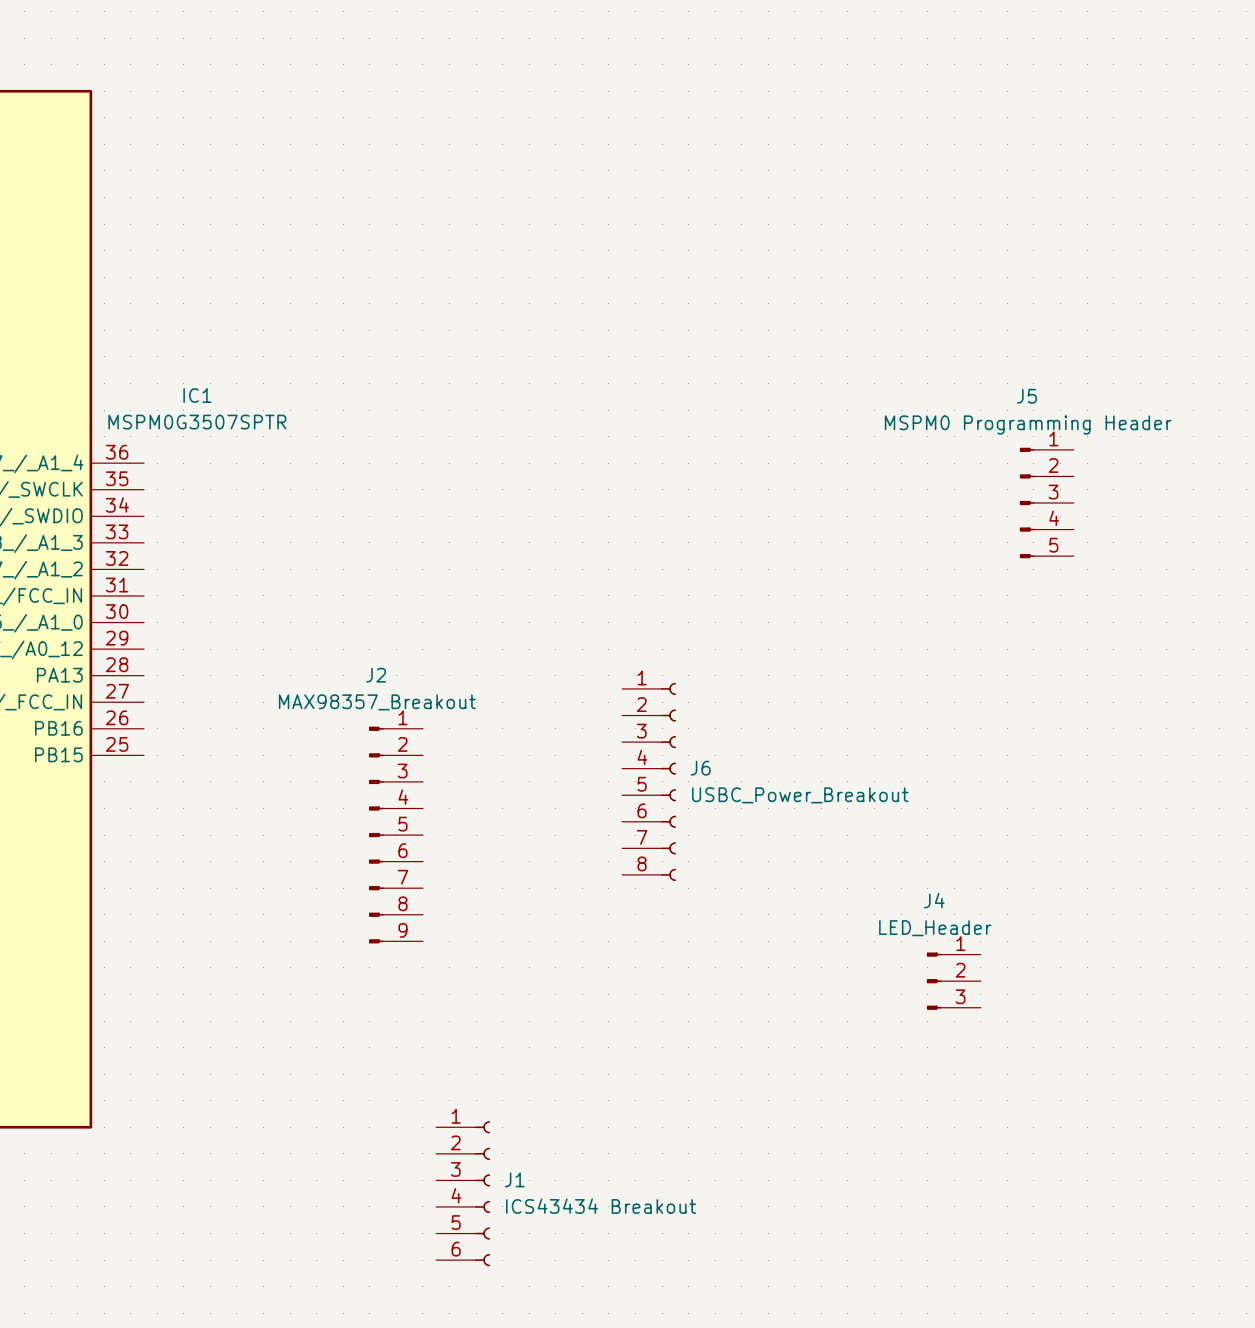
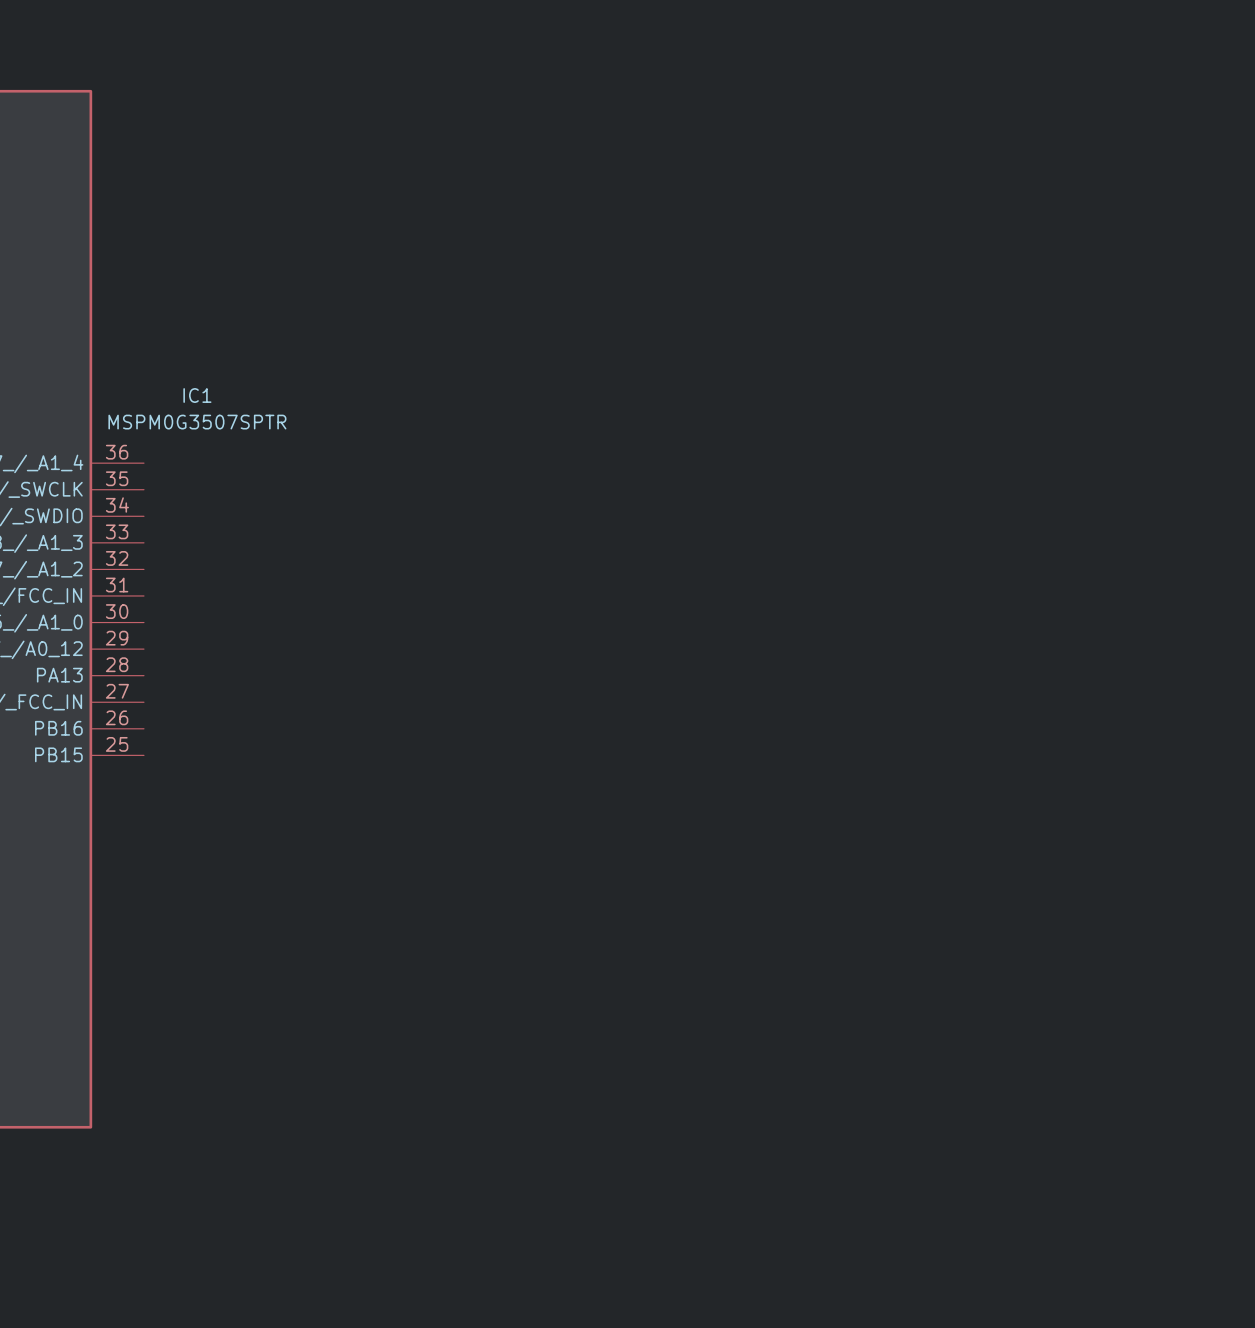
J5: MSPM0 Programming Header (1046, 503) -> none
J6: USBC_Power_Breakout (649, 781) -> none
J2: MAX98357_Breakout (395, 835) -> none
J4: LED_Header (953, 981) -> none
J1: ICS43434 Breakout (463, 1193) -> none

